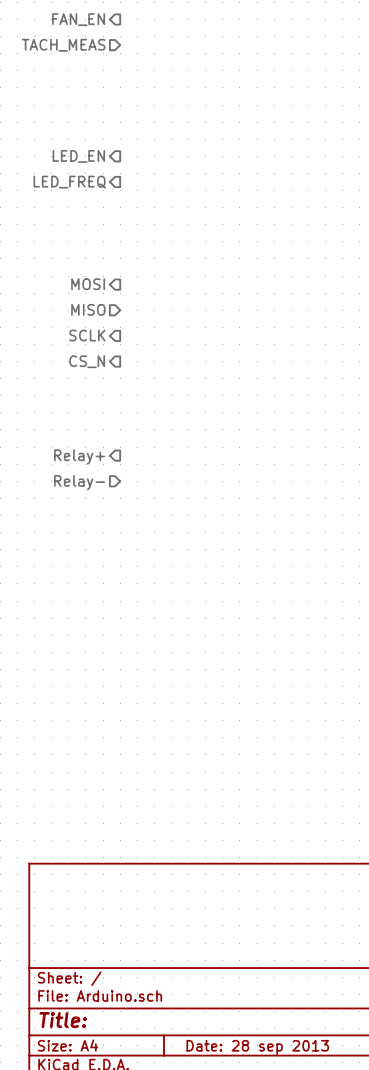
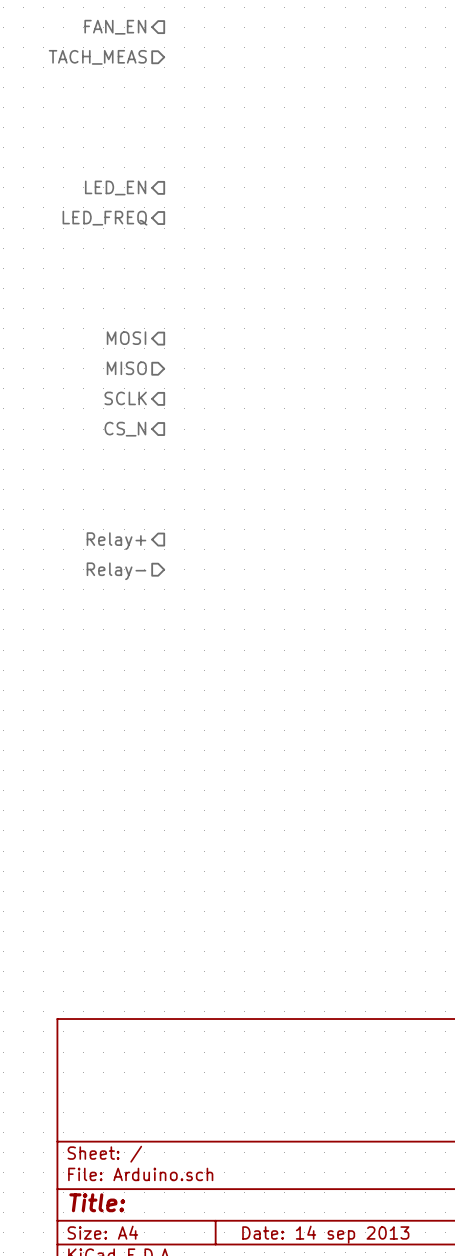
title block: Date: 28 sep 2013 (257, 1047) -> Date: 14 sep 2013 (325, 1234)

